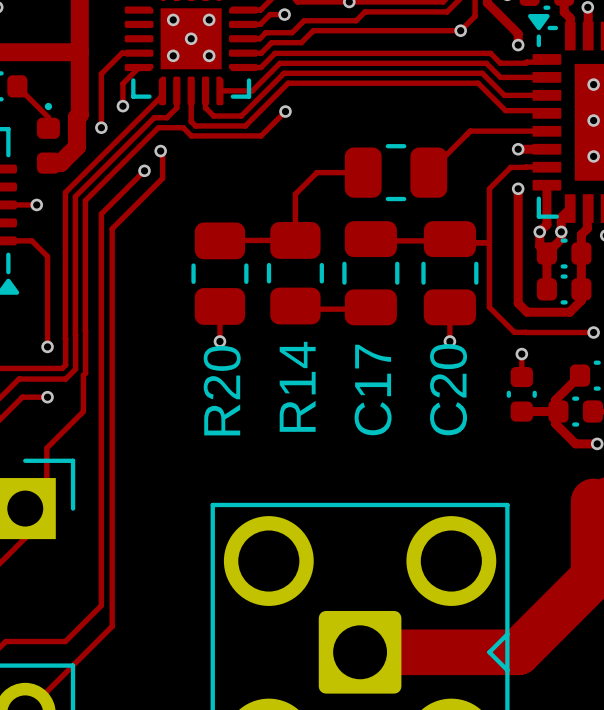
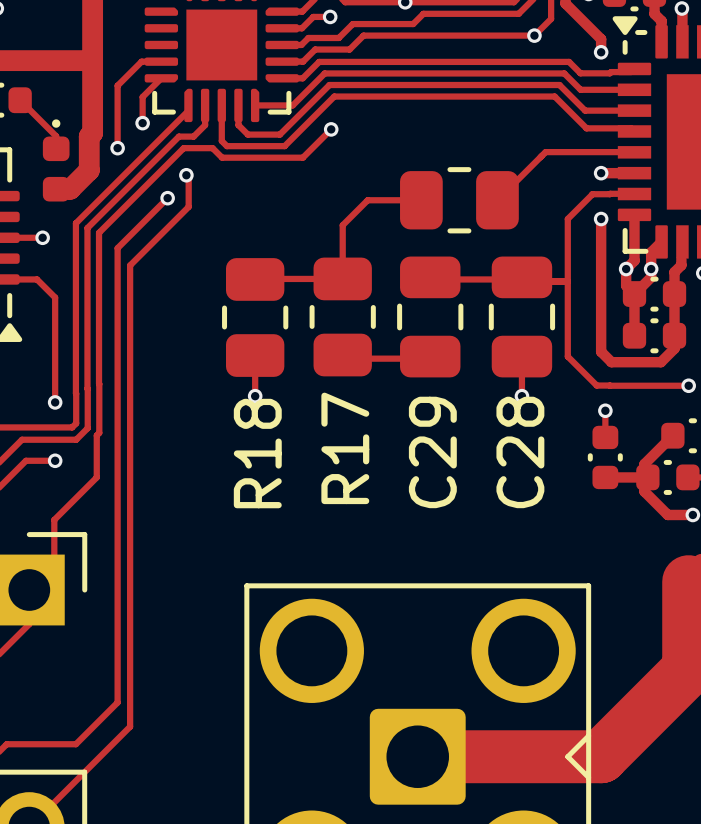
via: (173, 19) -> none
via: (209, 19) -> none
via: (191, 38) -> none
via: (173, 55) -> none
via: (209, 55) -> none
via: (593, 84) -> none
via: (593, 120) -> none
via: (593, 156) -> none
R14 name: R14 (297, 386) -> R17 (345, 448)
C17 name: C17 (373, 389) -> C29 (432, 452)
C20 name: C20 (448, 389) -> C28 (520, 452)
R20 name: R20 (222, 390) -> R18 (257, 453)

